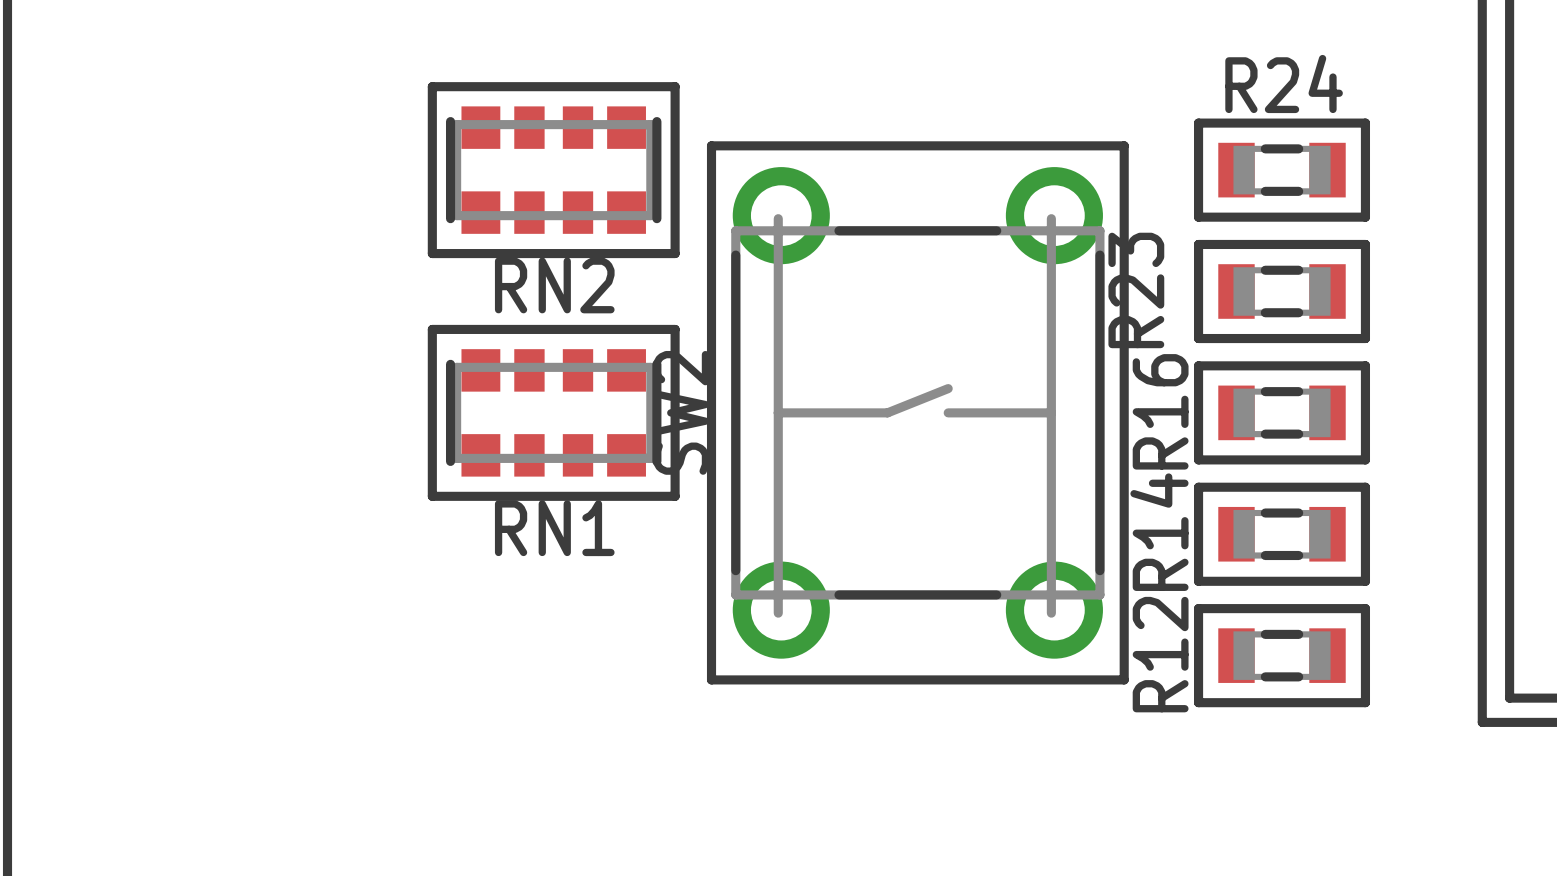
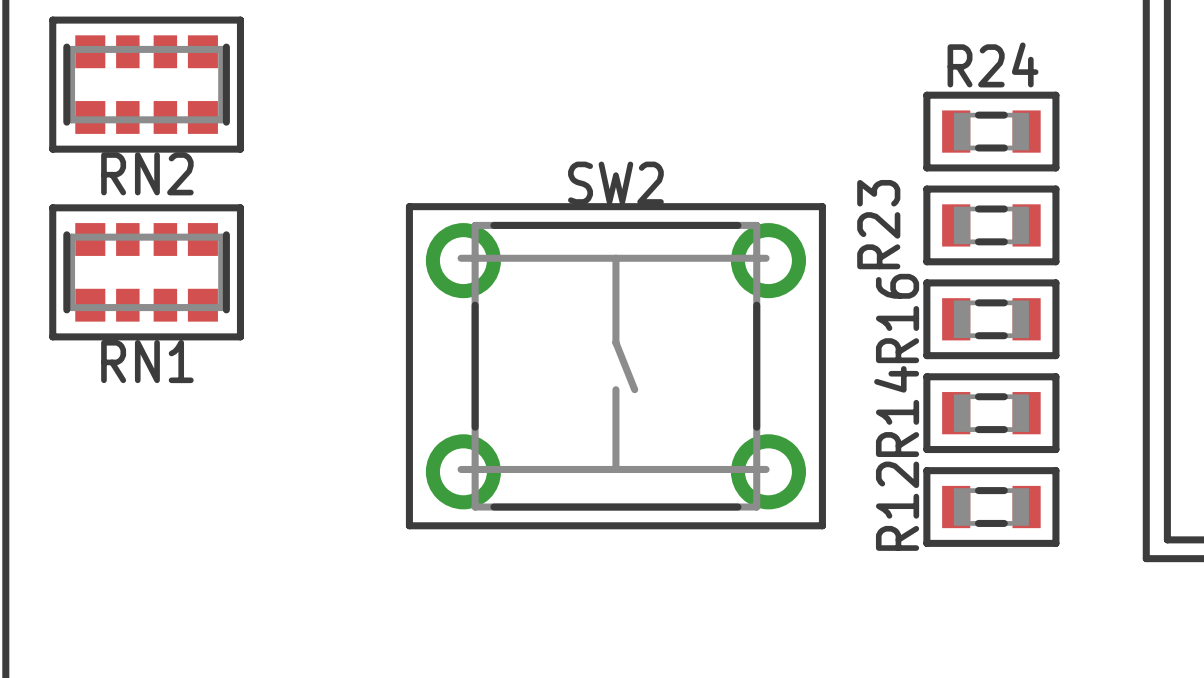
RN2 position: (553, 170) -> (146, 84)
RN1 position: (553, 412) -> (146, 272)
SW2 rotation: 0° (917, 412) -> 90° clockwise (615, 366)

